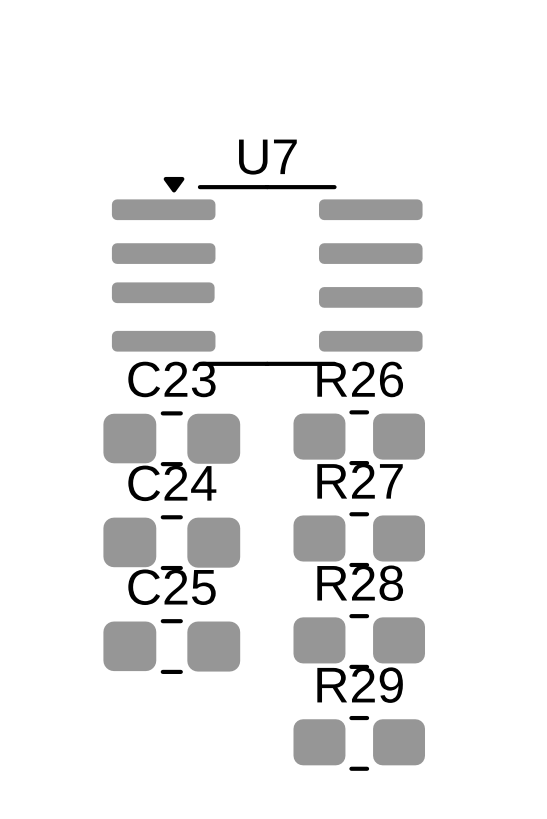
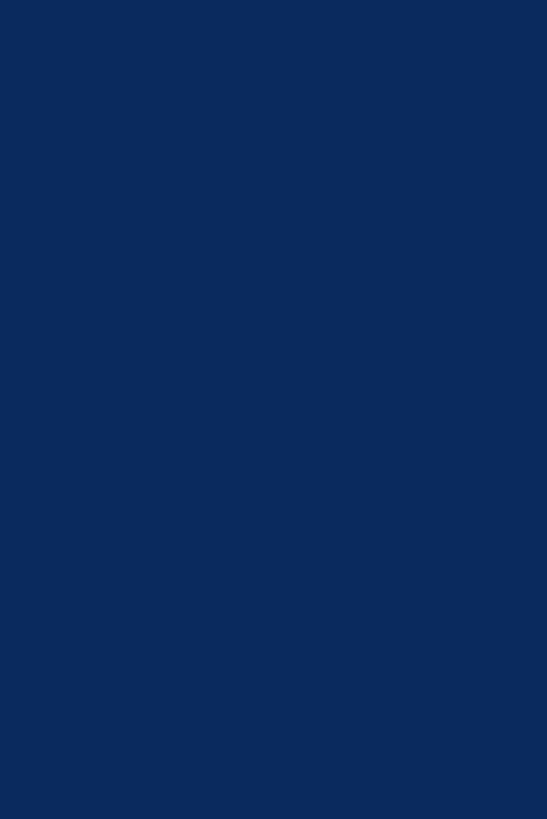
U7: (267, 271) -> none
R26: (359, 437) -> none
C23: (171, 438) -> none
R27: (359, 539) -> none
C24: (171, 542) -> none
R28: (359, 641) -> none
C25: (171, 646) -> none
R29: (359, 743) -> none

